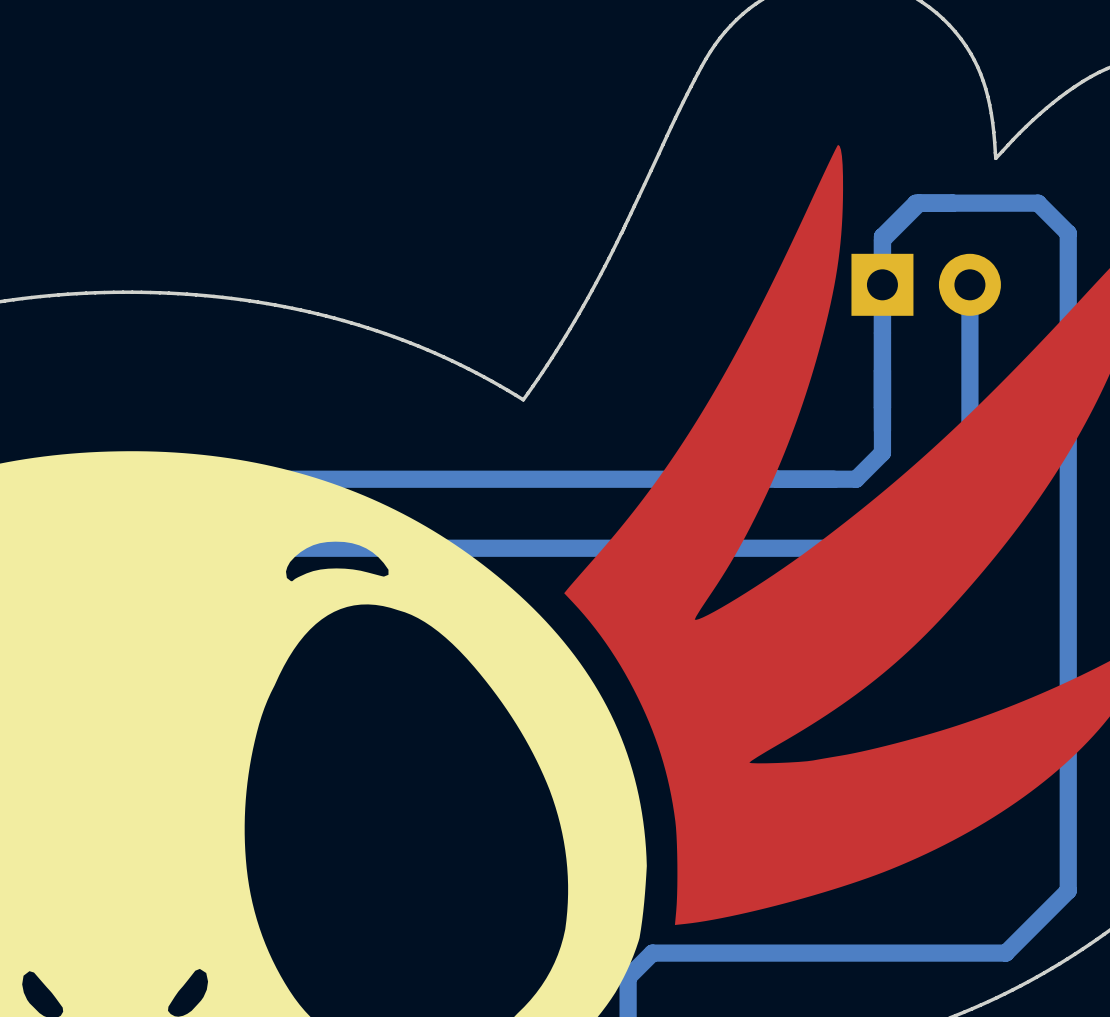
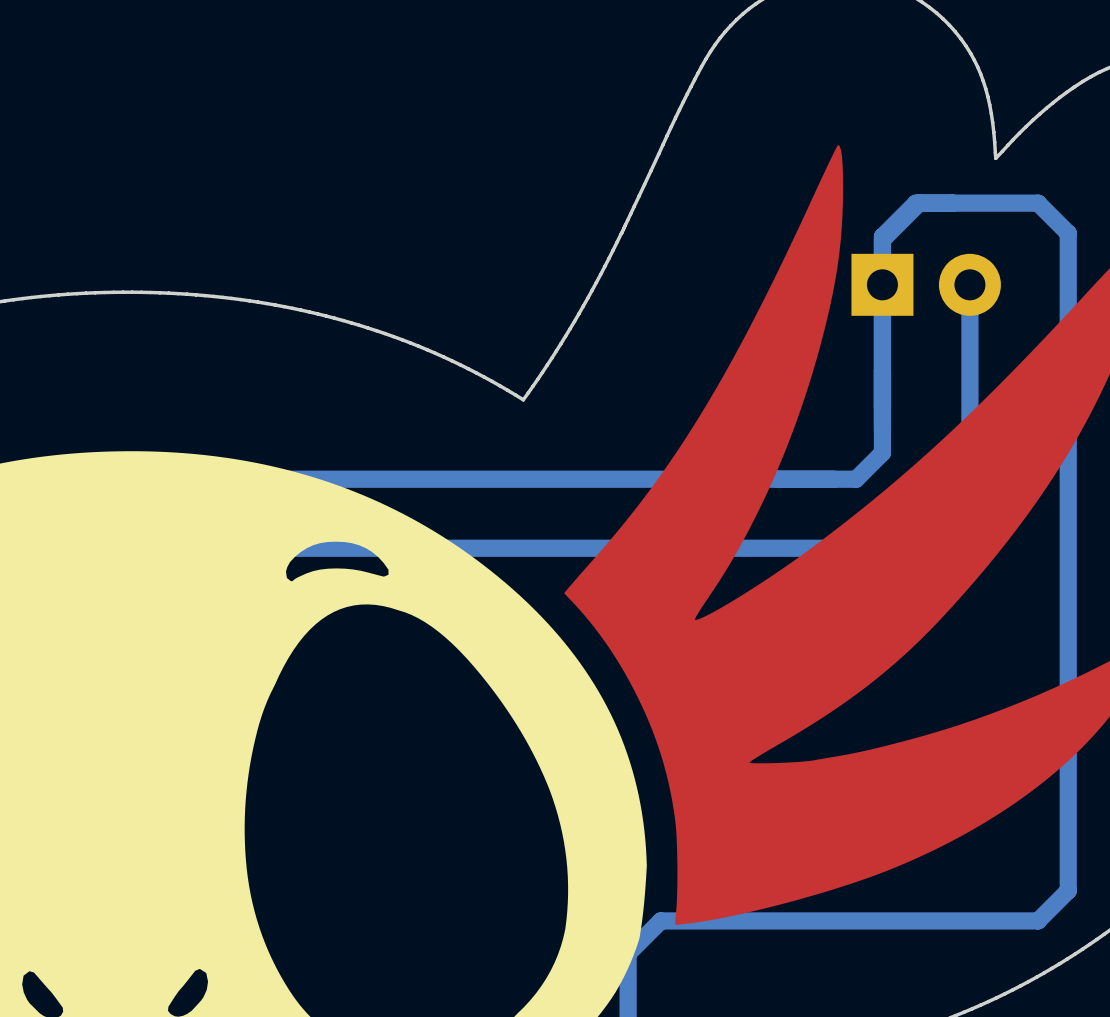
bottom track: (1038, 920) (1005, 953) (652, 953) (628, 977) -> (1038, 920) (660, 920) (628, 953) (628, 977)

